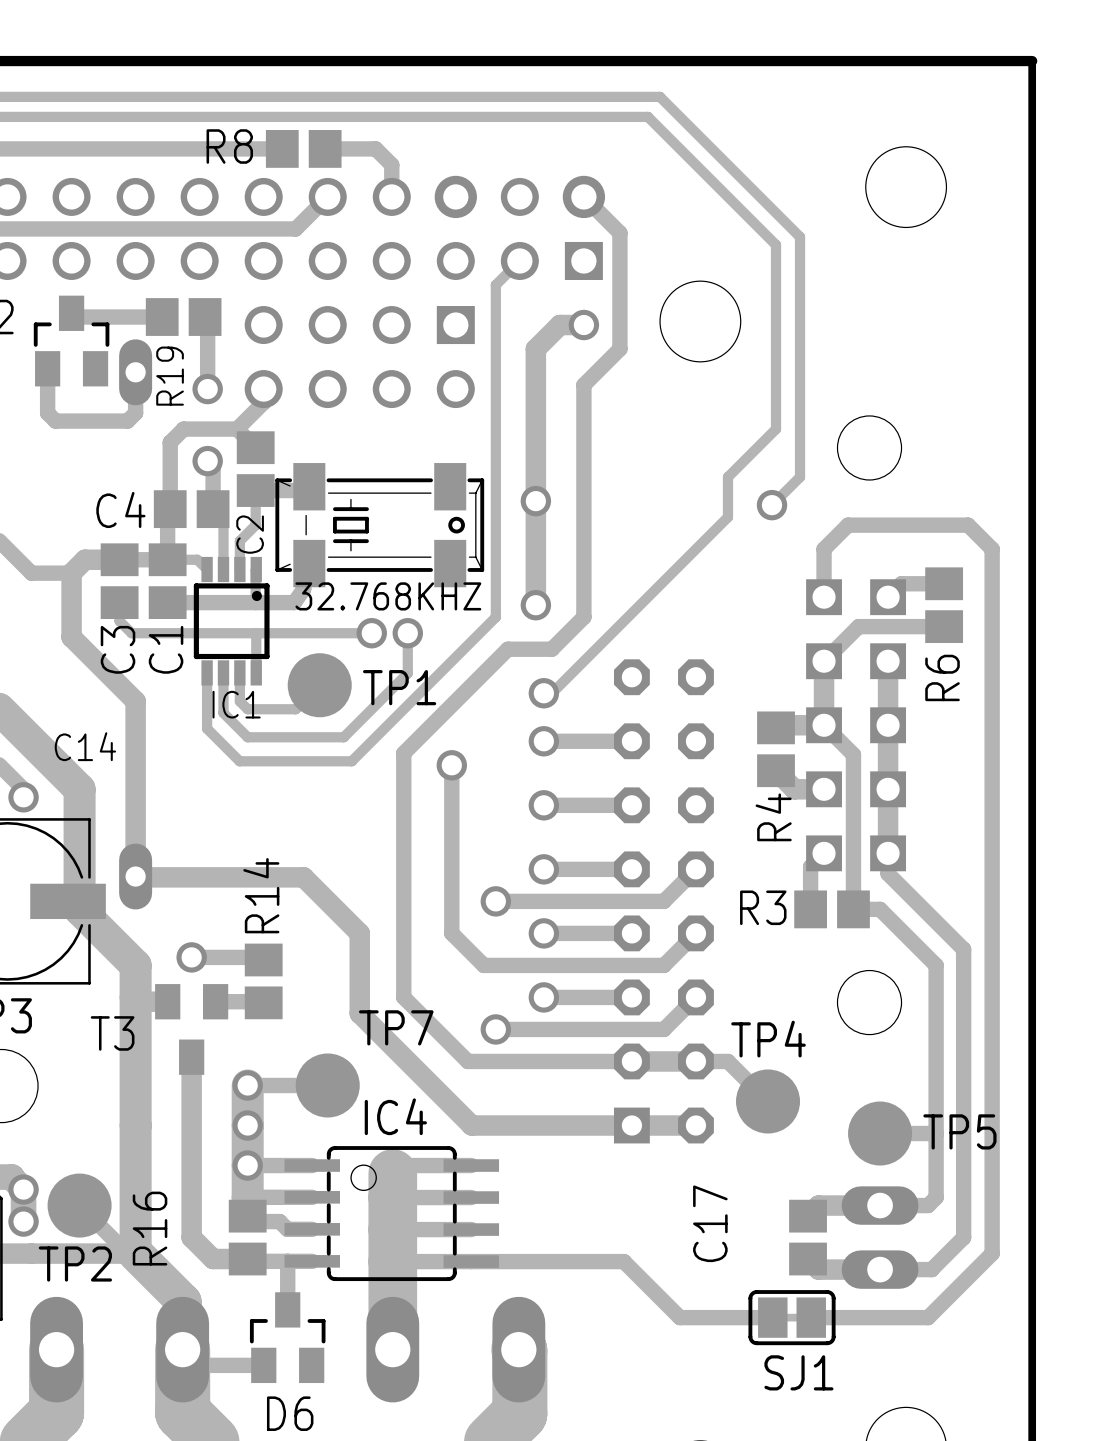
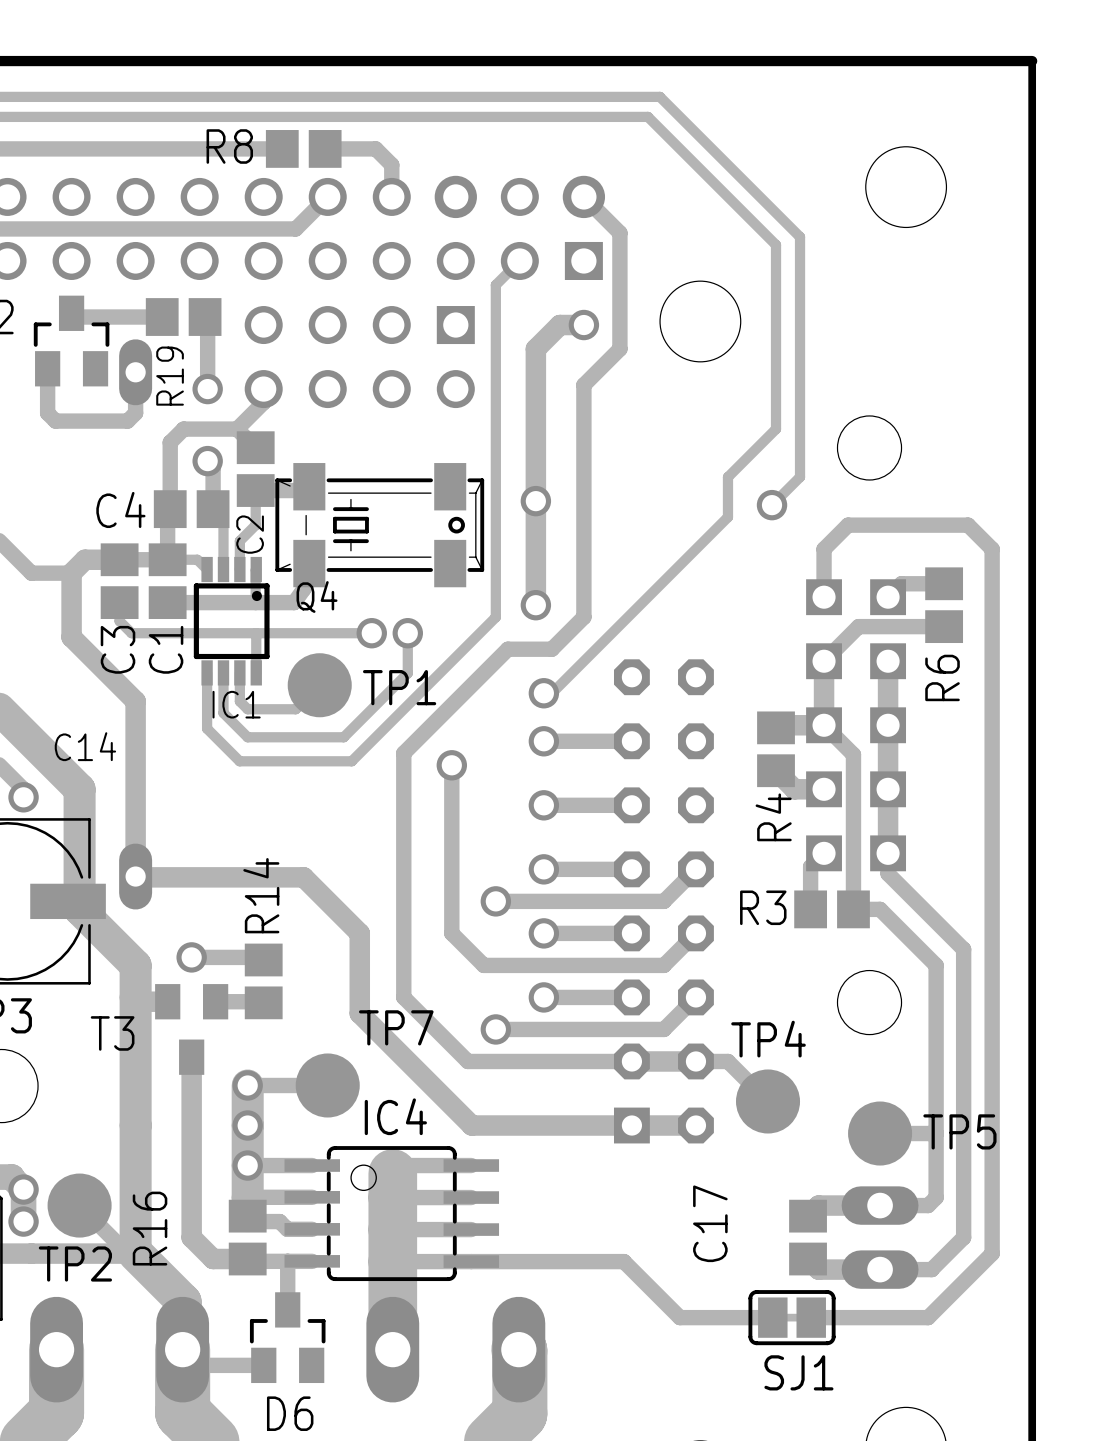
32.768KHZ name: 32.768KHZ (388, 596) -> Q4 (317, 597)

